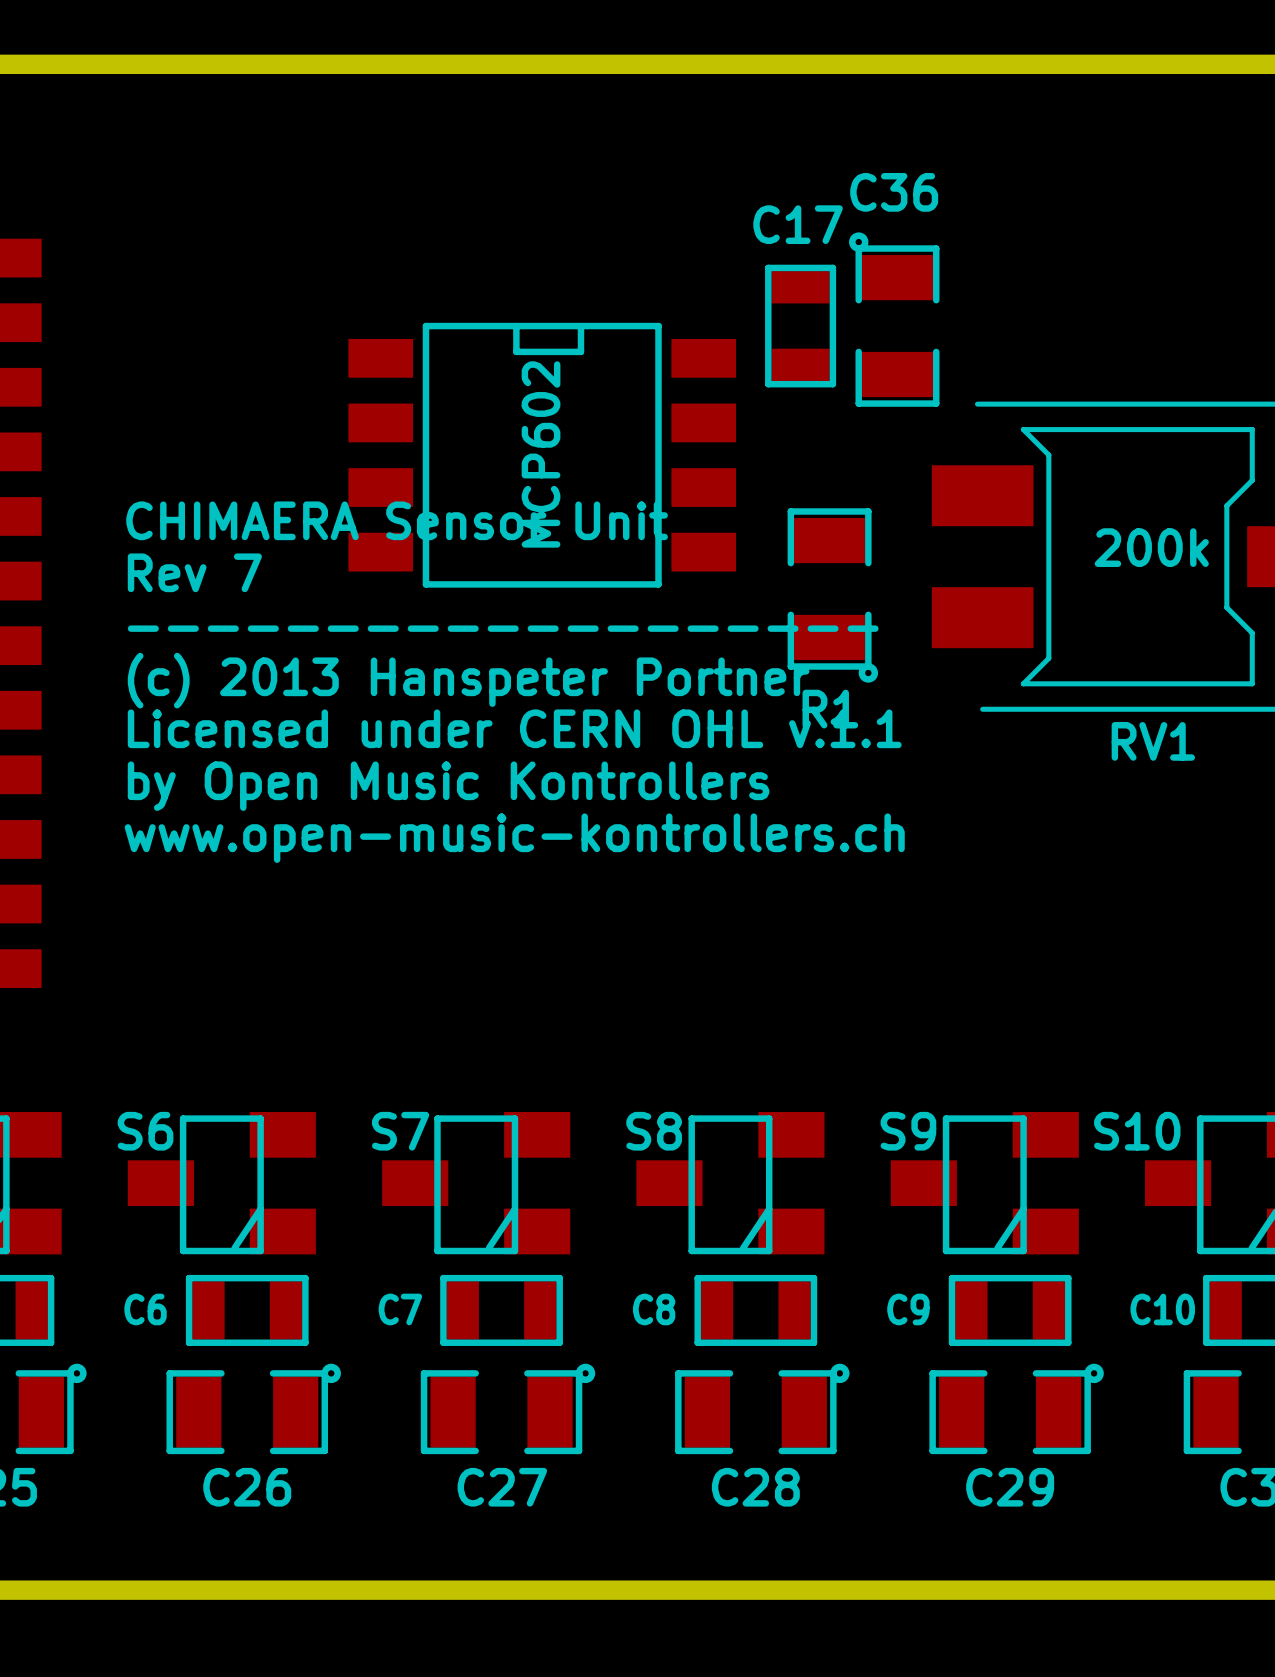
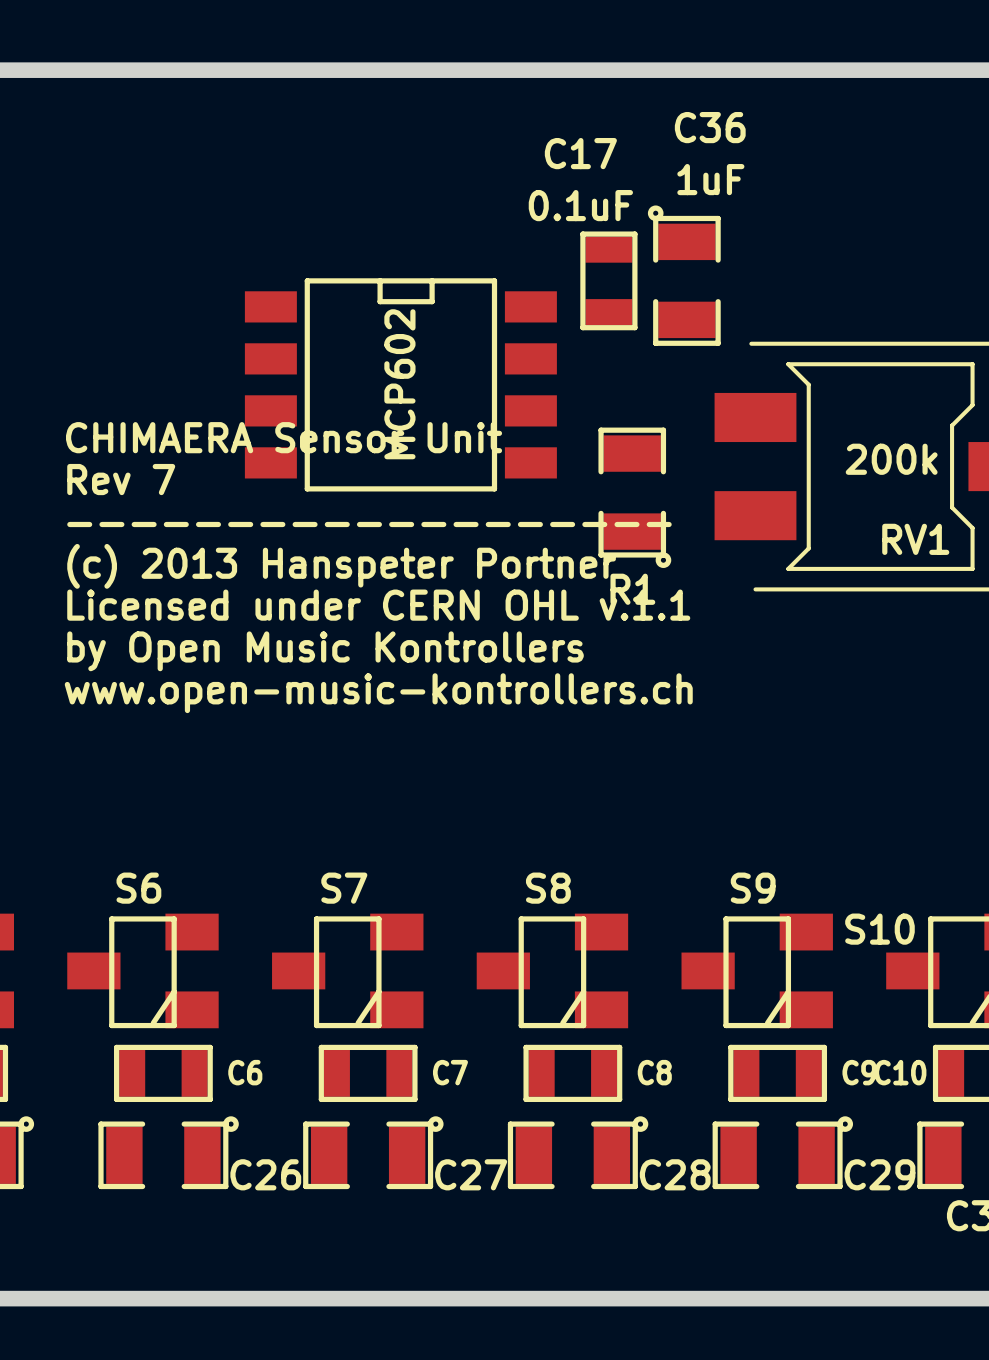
C36 name position: C36 (894, 192) -> C36 (710, 127)
C36 value: none -> 1uF (710, 179)
C17 name position: C17 (798, 224) -> C17 (580, 153)
C17 value: none -> 0.1uF (580, 205)
RV1 name position: RV1 (1153, 741) -> RV1 (915, 539)
S6 name position: S6 (145, 1131) -> S6 (138, 888)
S7 name position: S7 (400, 1131) -> S7 (344, 888)
S8 name position: S8 (654, 1131) -> S8 (548, 888)
S9 name position: S9 (908, 1131) -> S9 (753, 888)
C6 name position: C6 (145, 1309) -> C6 (245, 1072)
C7 name position: C7 (400, 1309) -> C7 (450, 1072)
C8 name position: C8 (654, 1309) -> C8 (654, 1072)
C9 name position: C9 (908, 1309) -> C9 (859, 1072)
C26 name position: C26 (247, 1487) -> C26 (265, 1174)
C27 name position: C27 (502, 1487) -> C27 (471, 1174)
C28 name position: C28 (755, 1487) -> C28 (675, 1174)
C29 name position: C29 (1010, 1487) -> C29 (879, 1174)

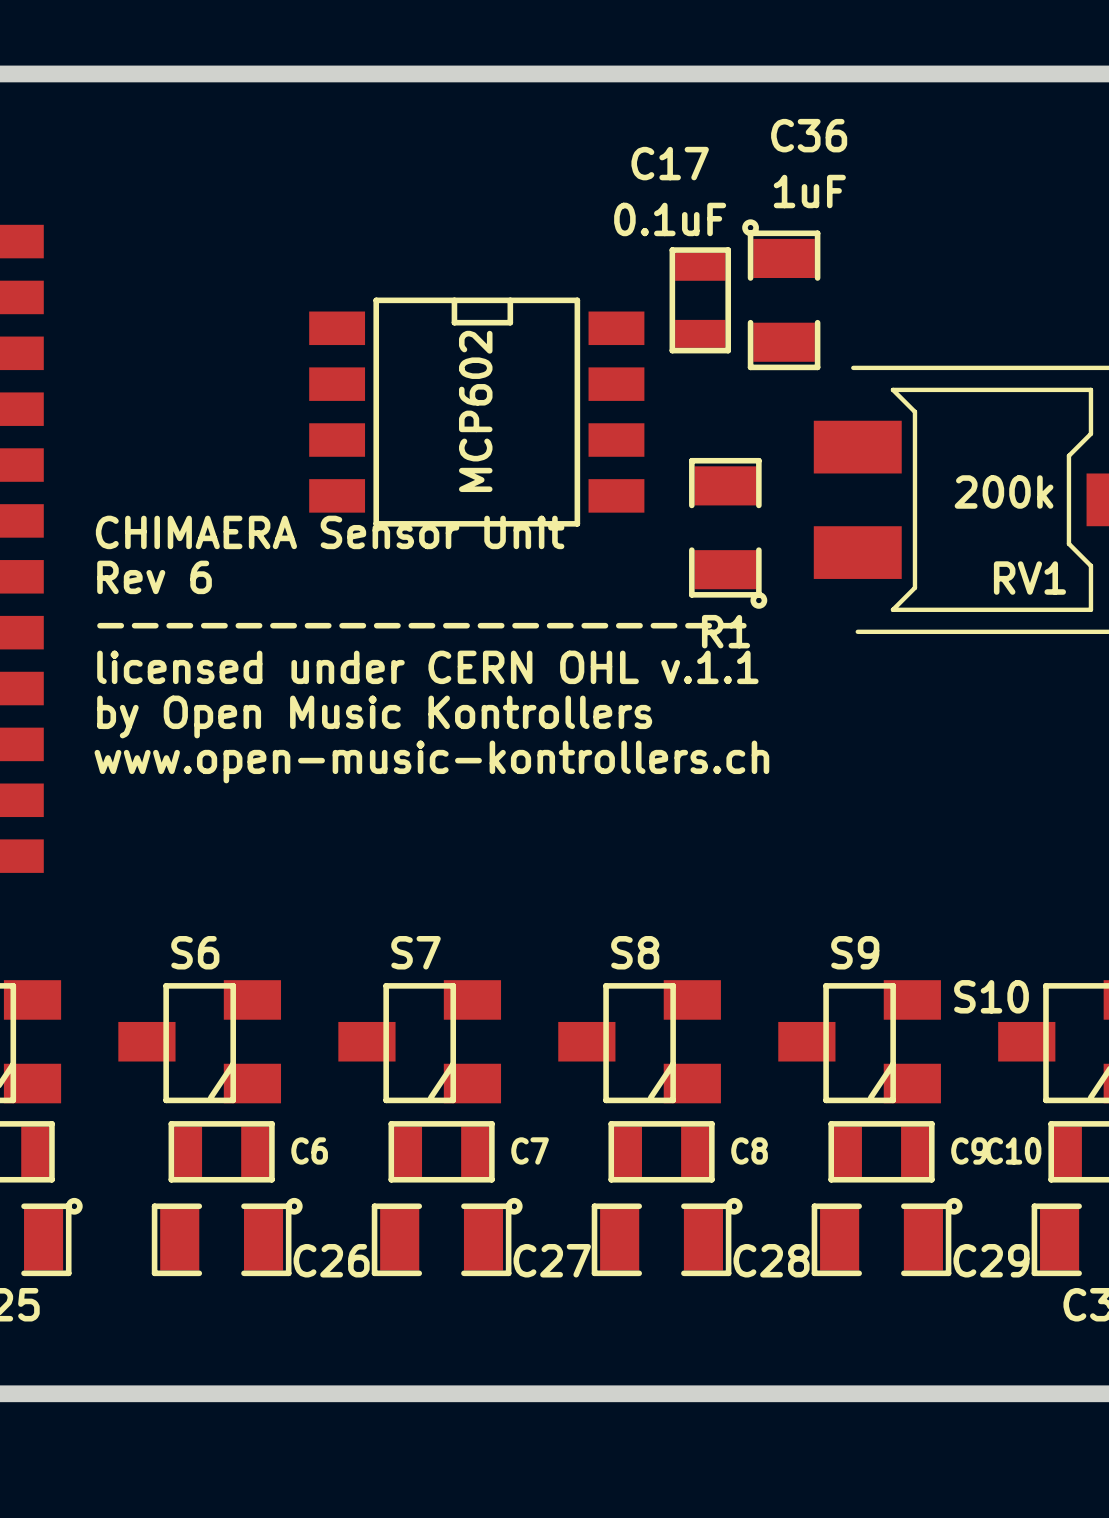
text position: CHIMAERA Sensor Unit (284, 437) -> CHIMAERA Sensor Unit (330, 532)
text: Rev 7 (121, 479) -> none
text position: ------------------- (369, 524) -> ------------------- (421, 625)
text: none -> Rev 6 (154, 577)
text: (c) 2013 Hanspeter Portner (341, 566) -> none
text: Licensed under CERN OHL v.1.1 (378, 605) -> licensed under CERN OHL v.1.1 (427, 667)
text position: by Open Music Kontrollers (325, 651) -> by Open Music Kontrollers (374, 716)
text position: www.open-music-kontrollers.ch (378, 693) -> www.open-music-kontrollers.ch (431, 761)

